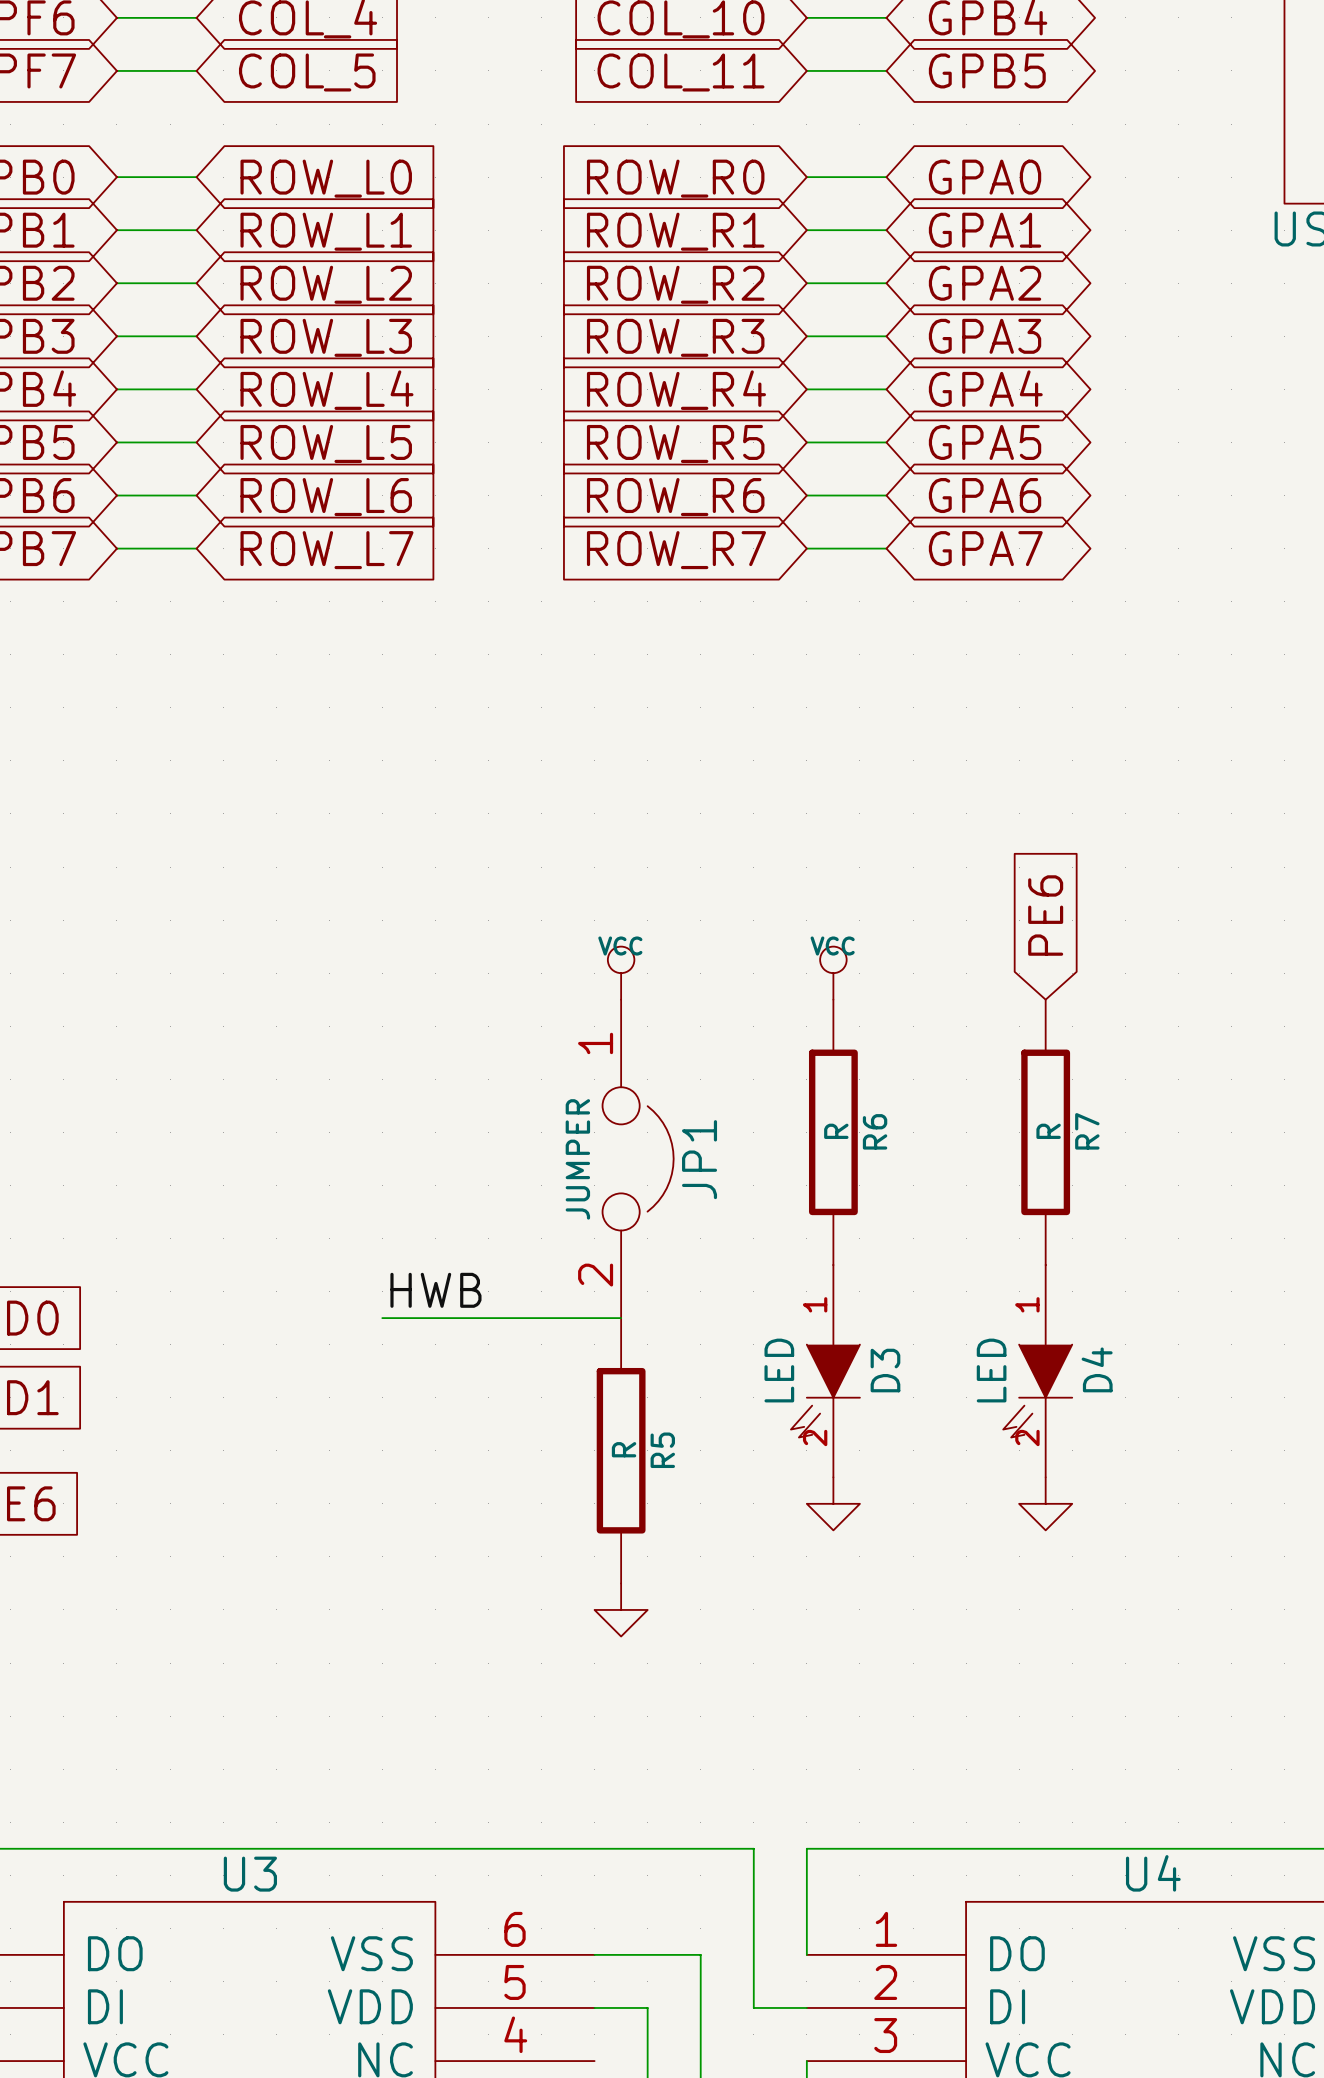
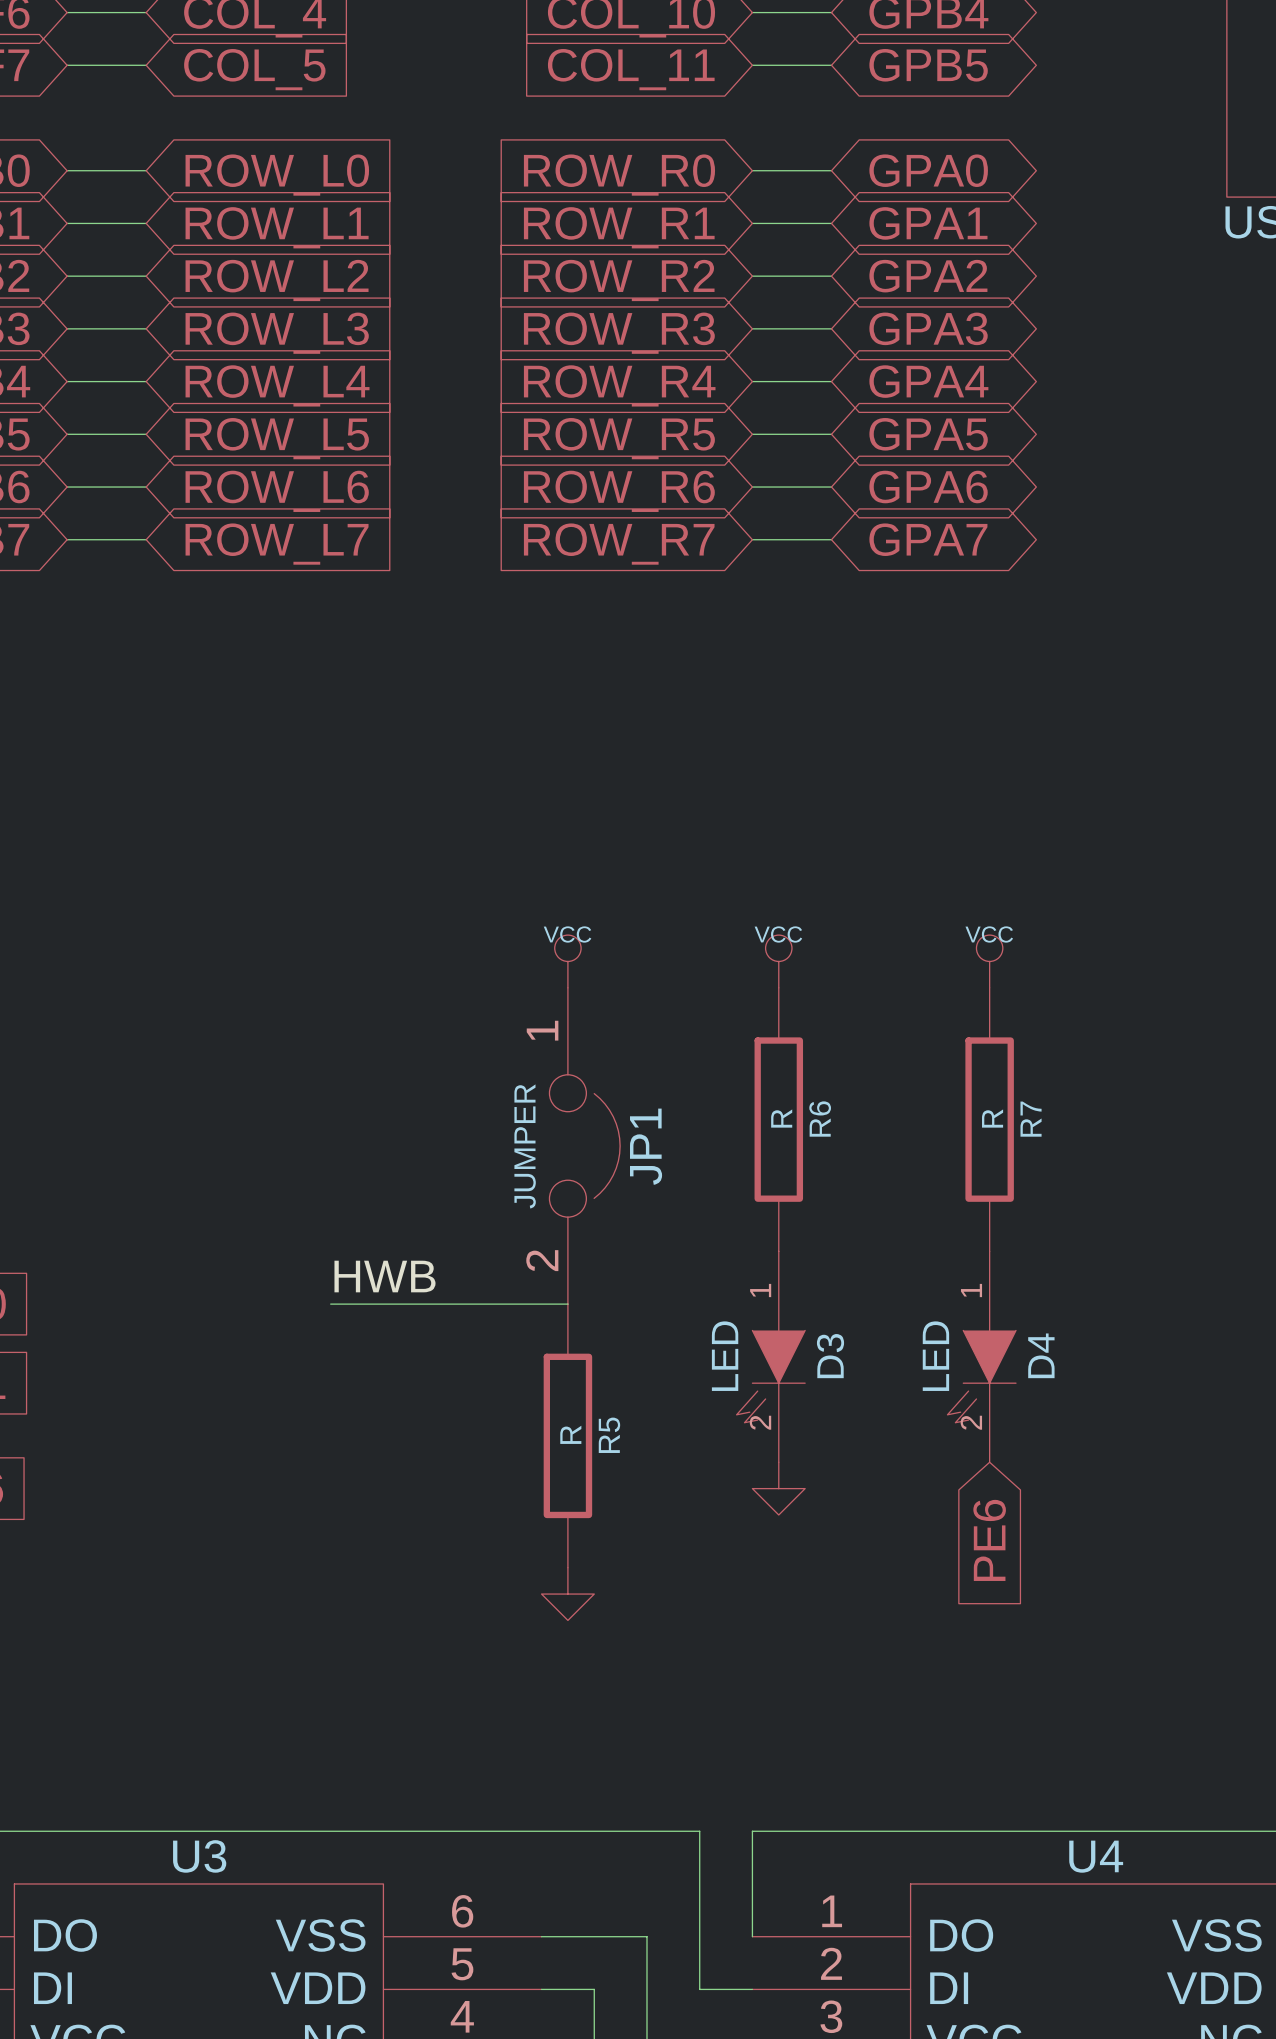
global label rotation: 0° (1045, 915) -> 180° (989, 1540)
global label position: PE6 (1045, 915) -> PE6 (989, 1540)
power symbol: none -> VCC (989, 961)
power symbol: (1045, 1503) -> none

